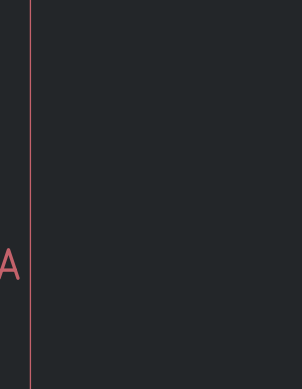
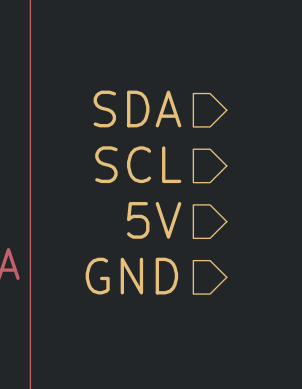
hierarchical label: none -> SDA (137, 108)
hierarchical label: none -> SCL (138, 164)
hierarchical label: none -> 5V (154, 220)
hierarchical label: none -> GND (131, 276)

